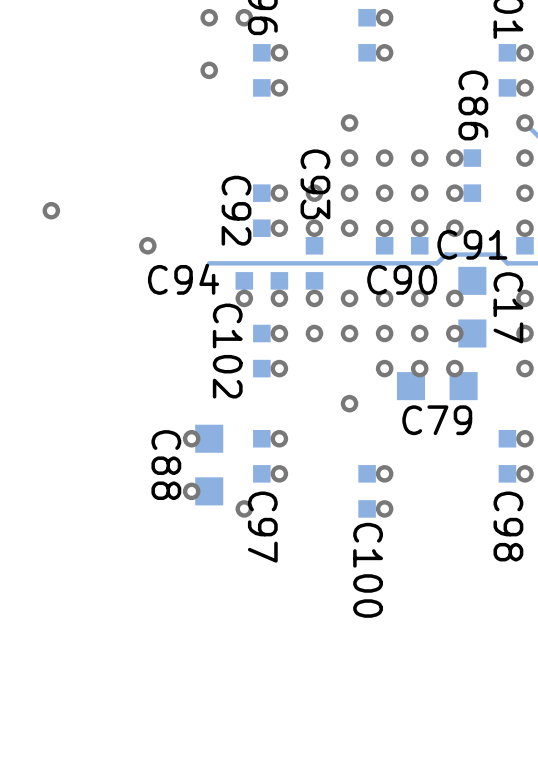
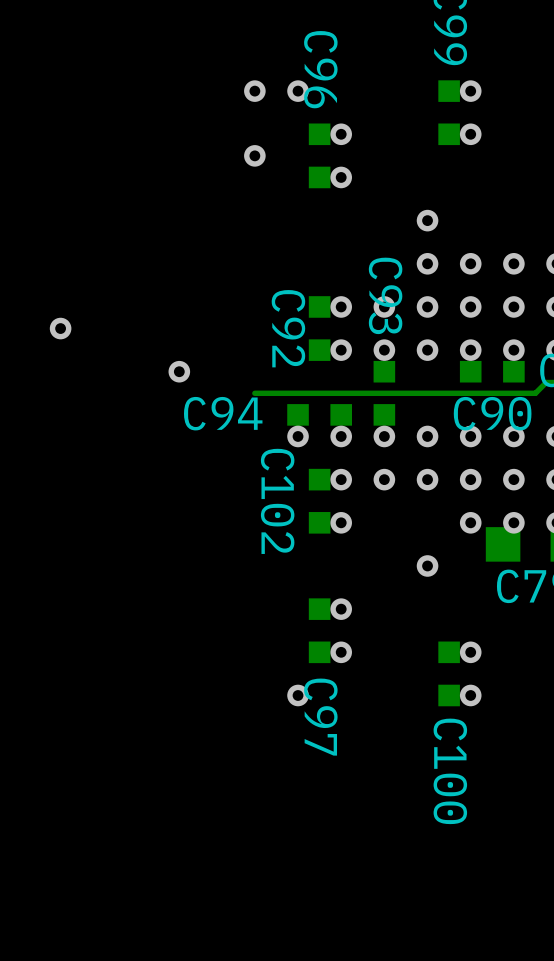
via: (191, 438) -> none
C88: (209, 465) -> none
via: (191, 491) -> none

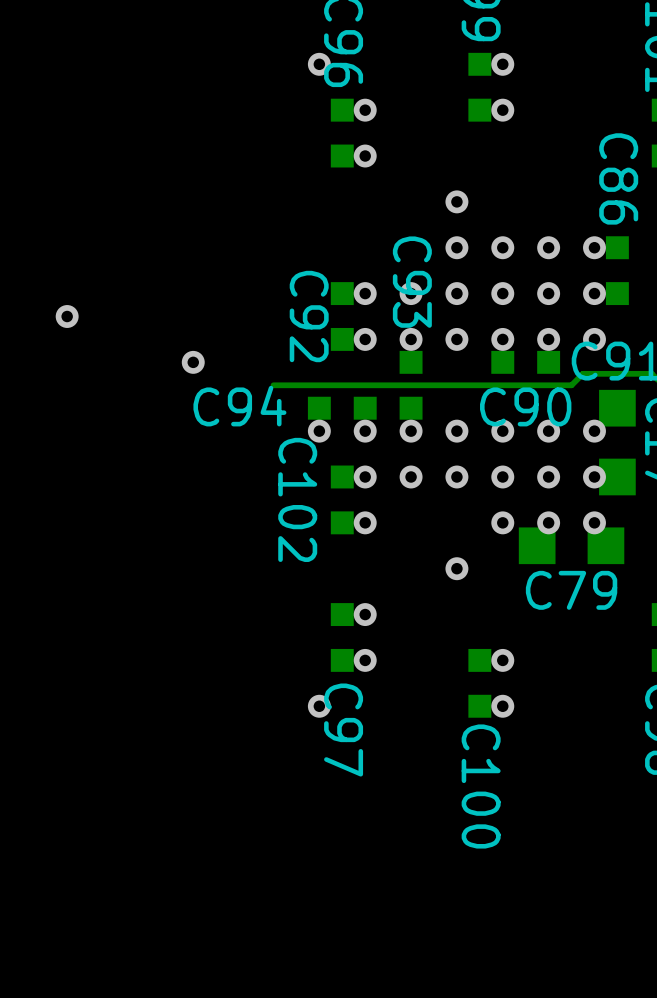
via: (254, 91) -> none
via: (254, 155) -> none

